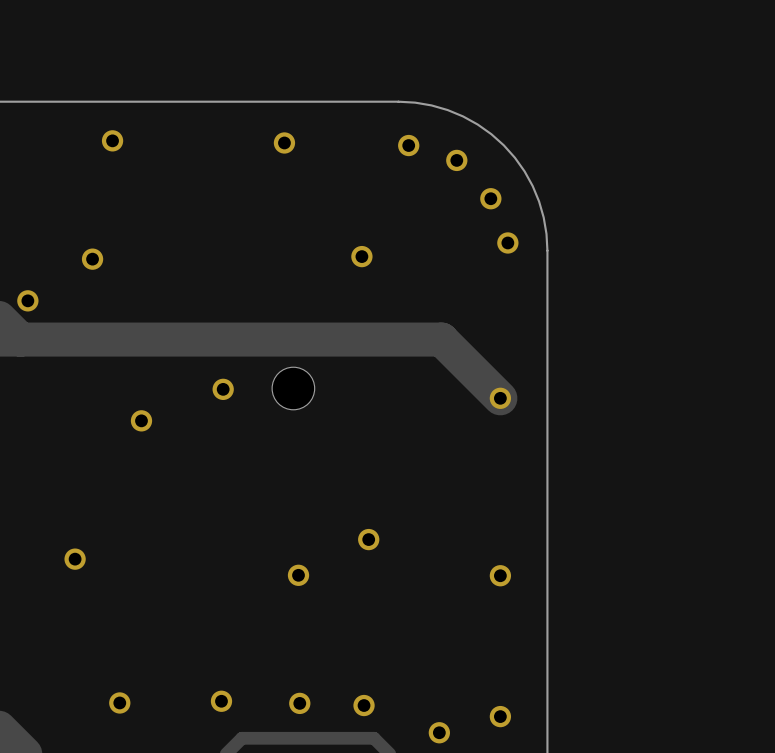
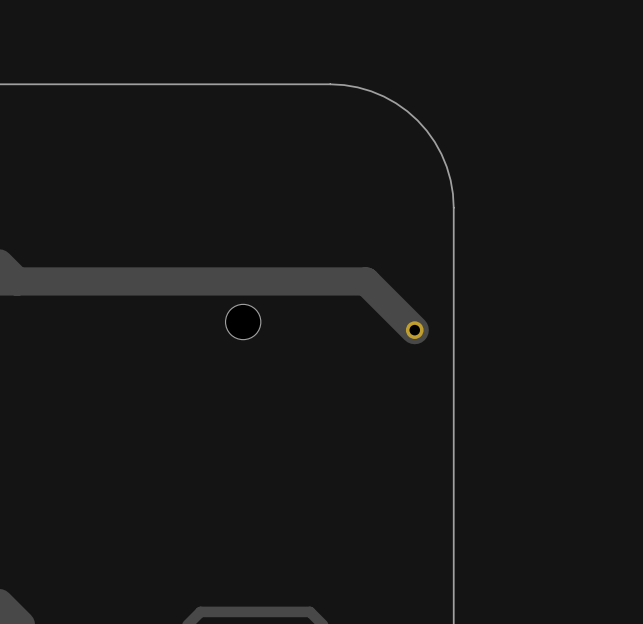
via: (112, 140) -> none
via: (284, 142) -> none
via: (408, 145) -> none
via: (456, 160) -> none
via: (490, 198) -> none
via: (507, 242) -> none
via: (361, 256) -> none
via: (92, 259) -> none
via: (27, 300) -> none
via: (223, 389) -> none
via: (141, 420) -> none
via: (368, 539) -> none
via: (75, 559) -> none
via: (298, 575) -> none
via: (500, 575) -> none
via: (221, 701) -> none
via: (119, 702) -> none
via: (299, 703) -> none
via: (364, 705) -> none
via: (500, 716) -> none
via: (439, 732) -> none

